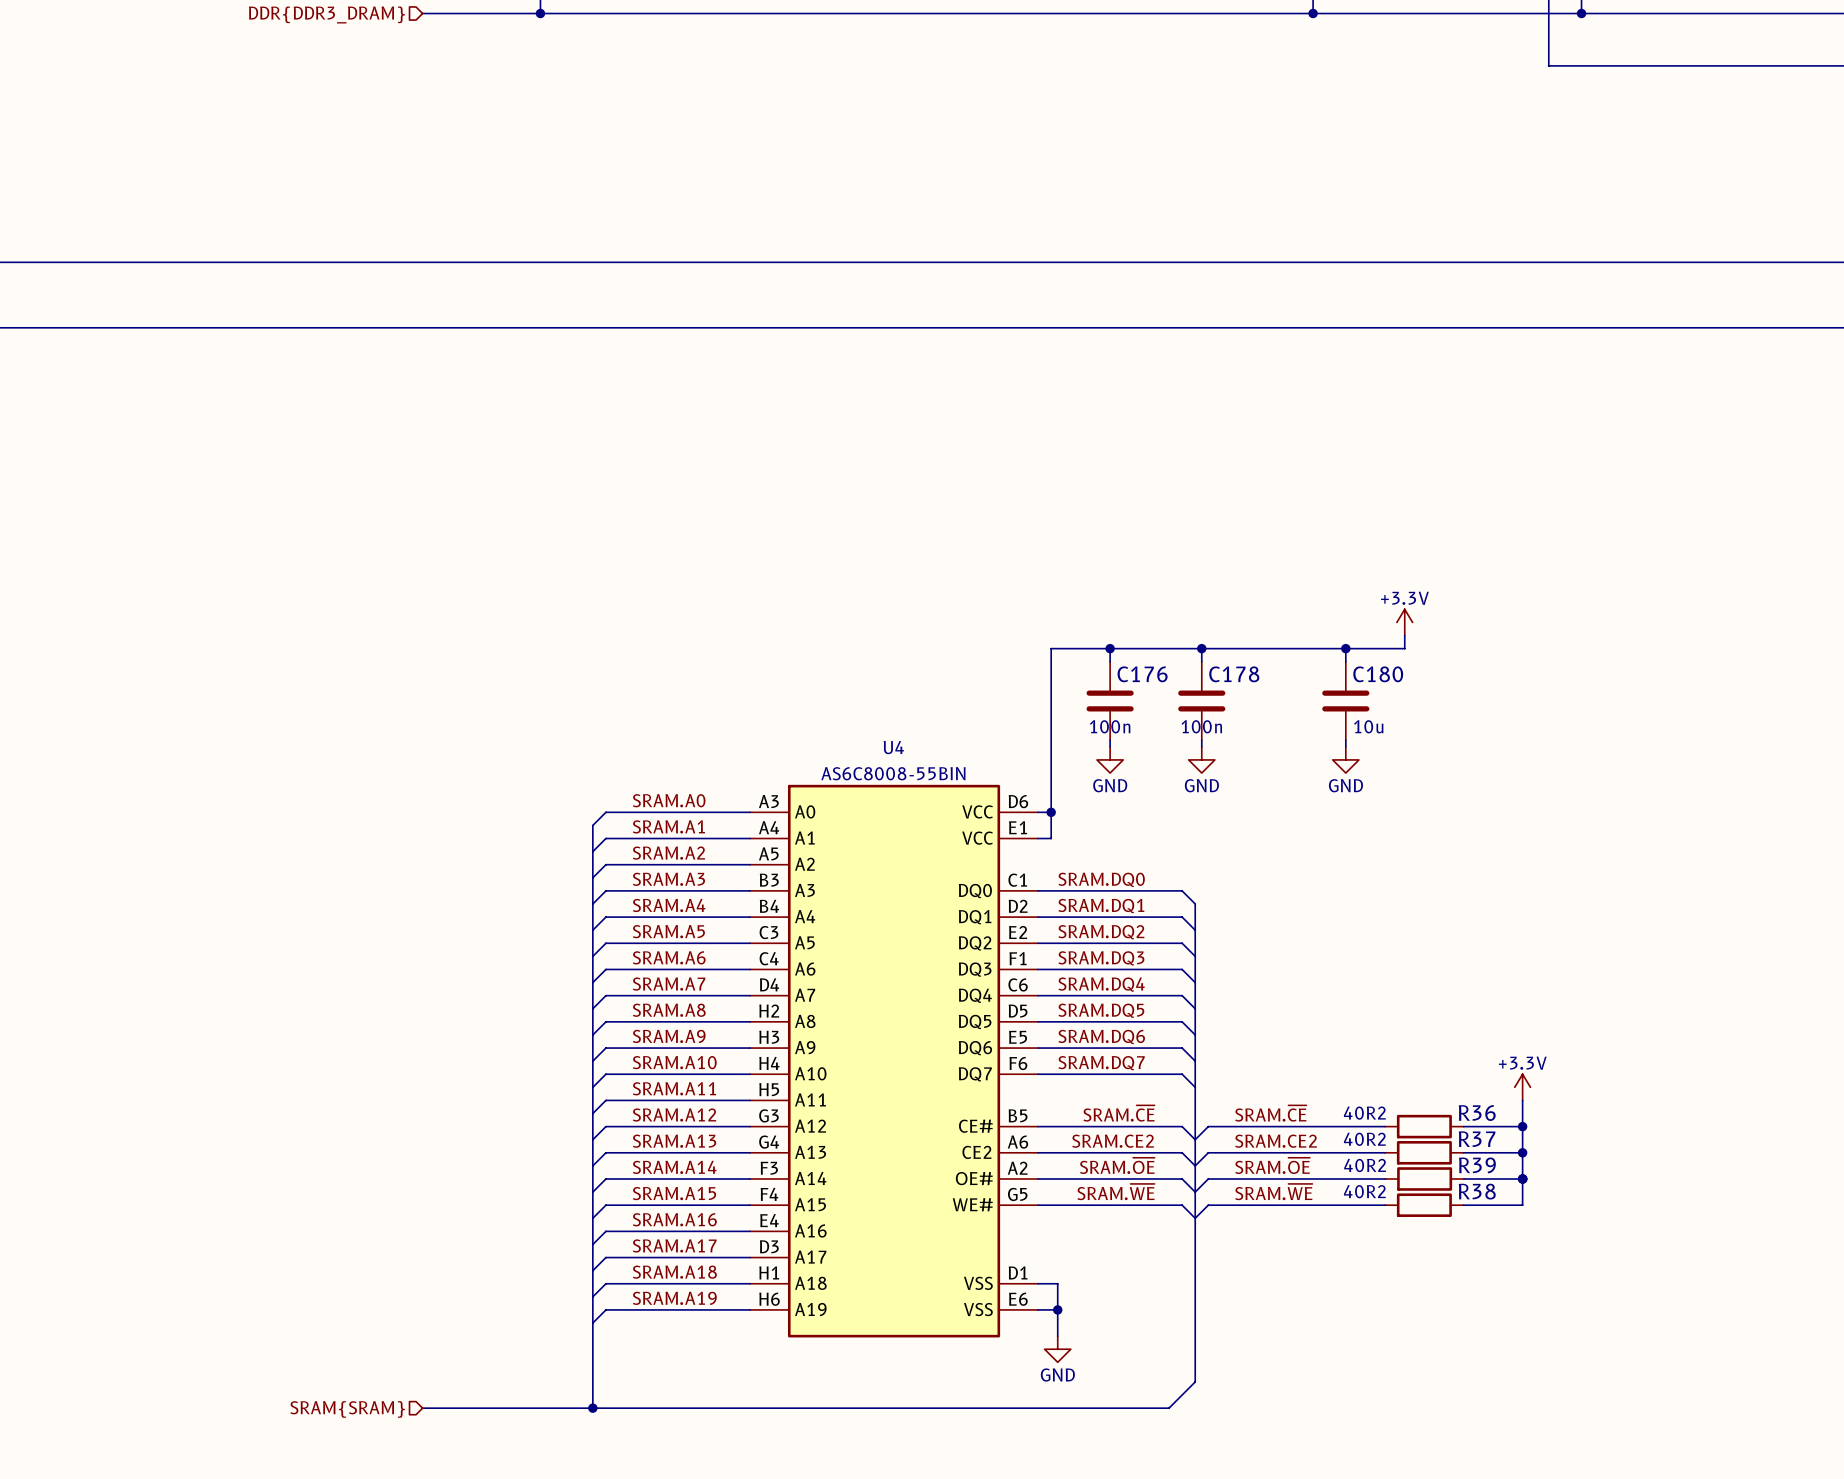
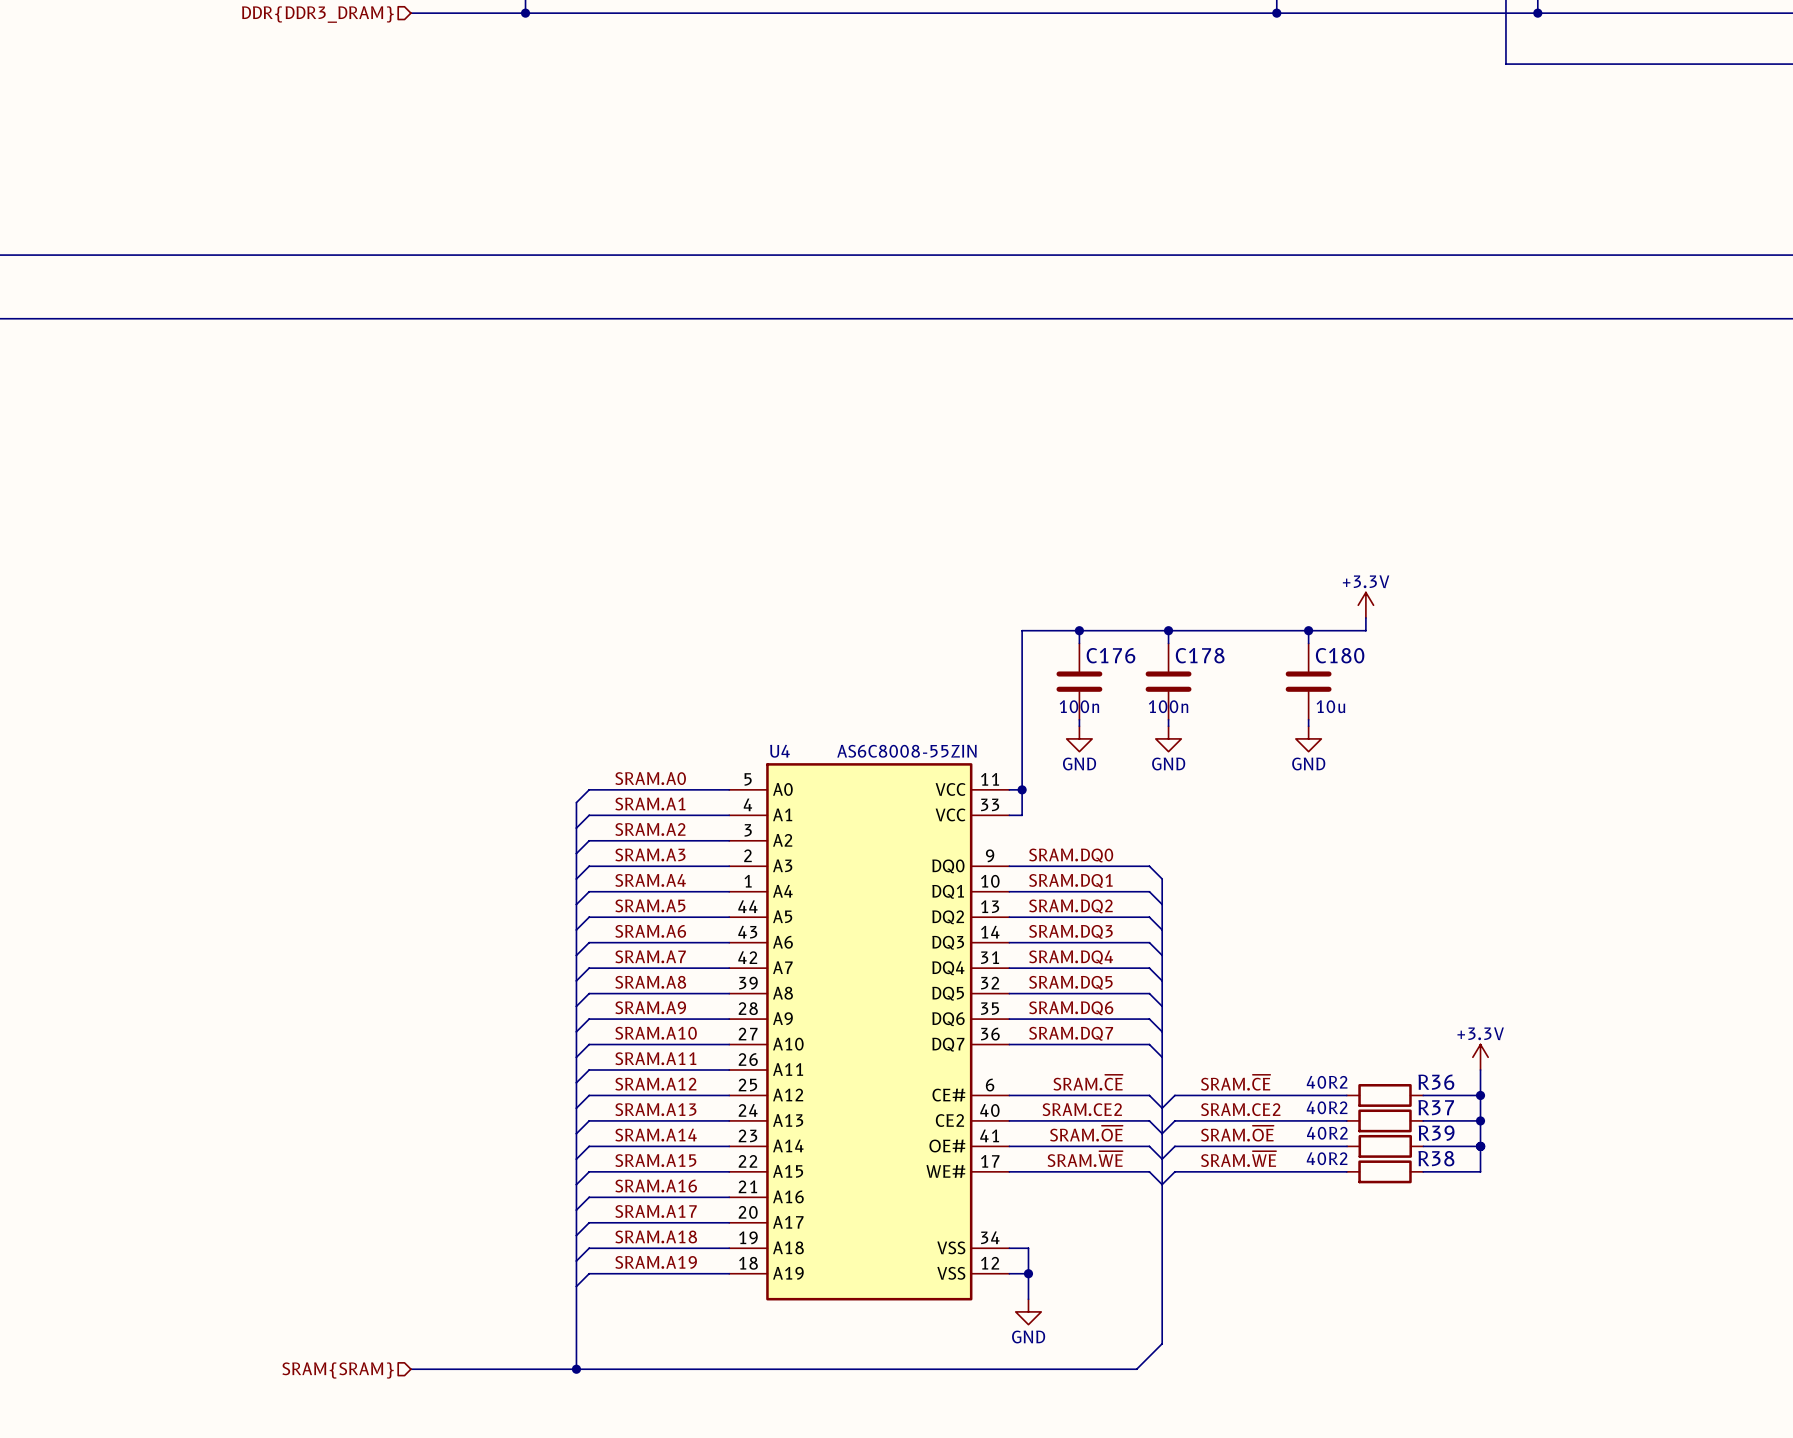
U4 name position: U4 (893, 747) -> U4 (779, 751)
U4 value: AS6C8008-55BIN (893, 773) -> AS6C8008-55ZIN (906, 751)
U4 symbol: [749, 784, 1039, 1338] -> [729, 763, 1010, 1301]

